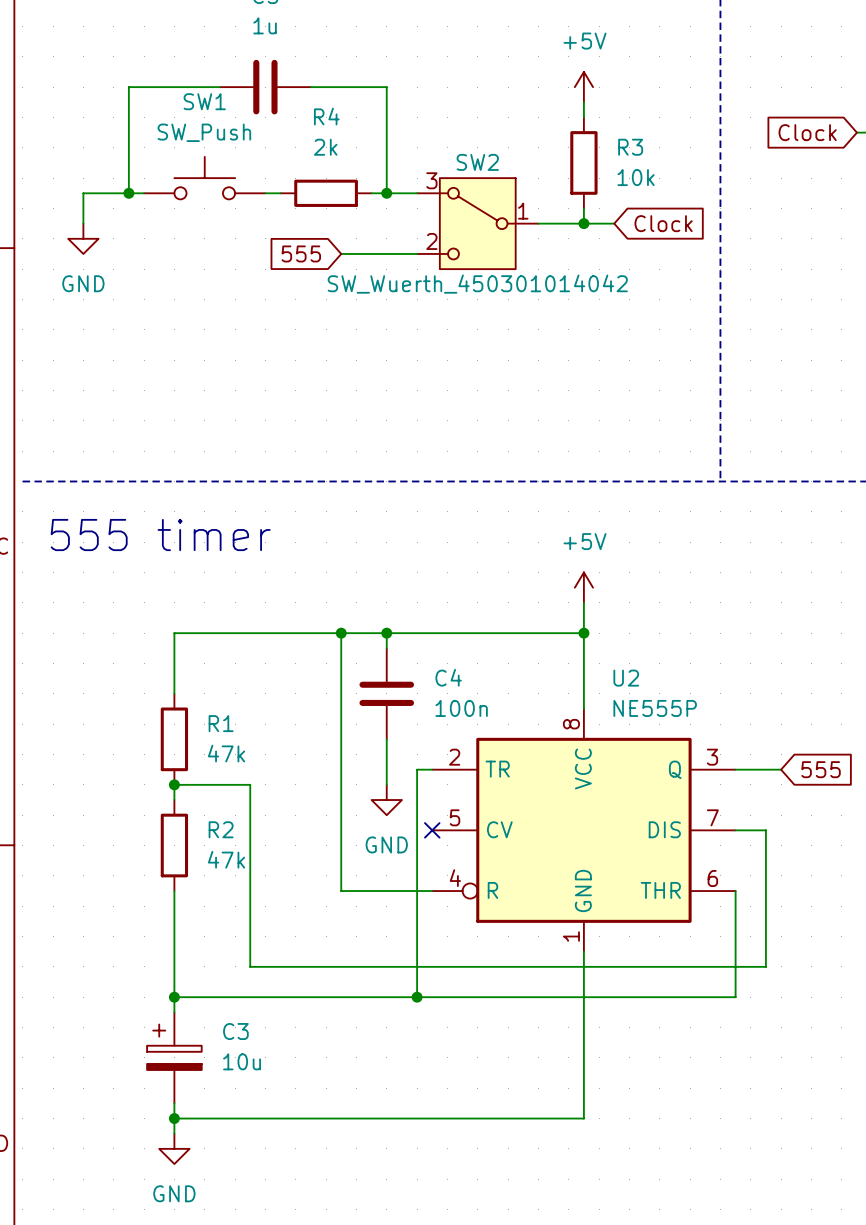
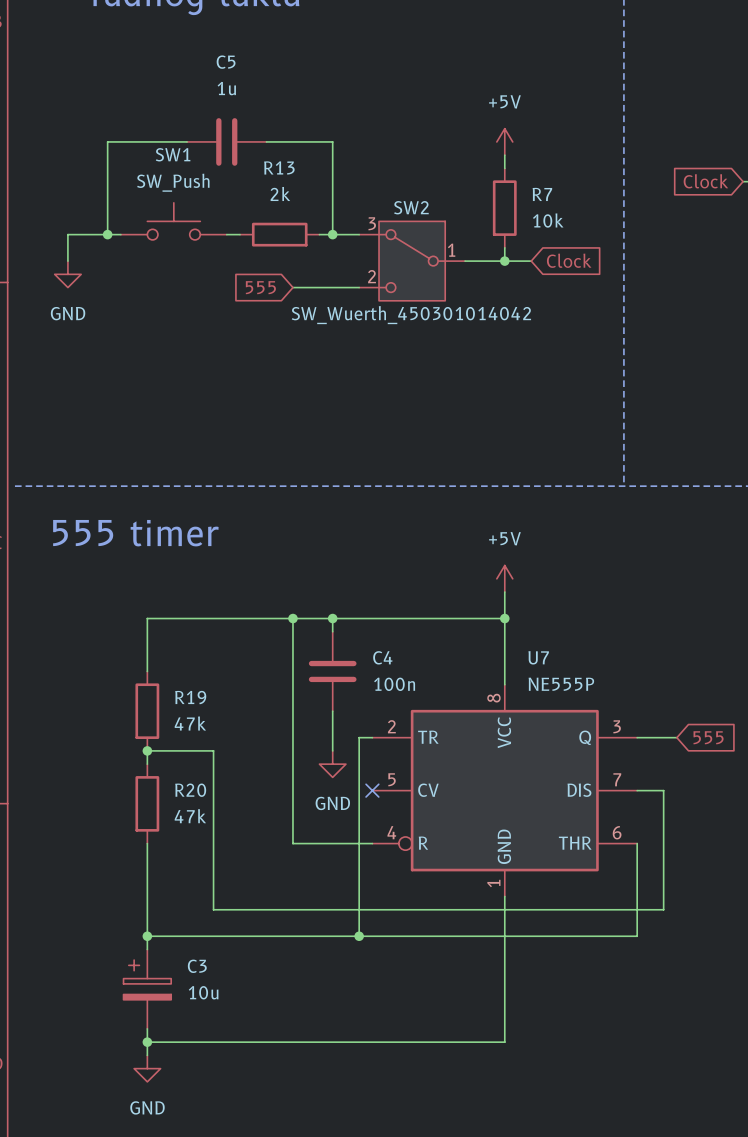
R4 name: R4 (326, 116) -> R13 (279, 167)
R3 name: R3 (630, 147) -> R7 (542, 194)
U2 name: U2 (626, 678) -> U7 (538, 657)
R1 name: R1 (221, 723) -> R19 (190, 697)
R2 name: R2 (221, 829) -> R20 (190, 790)

